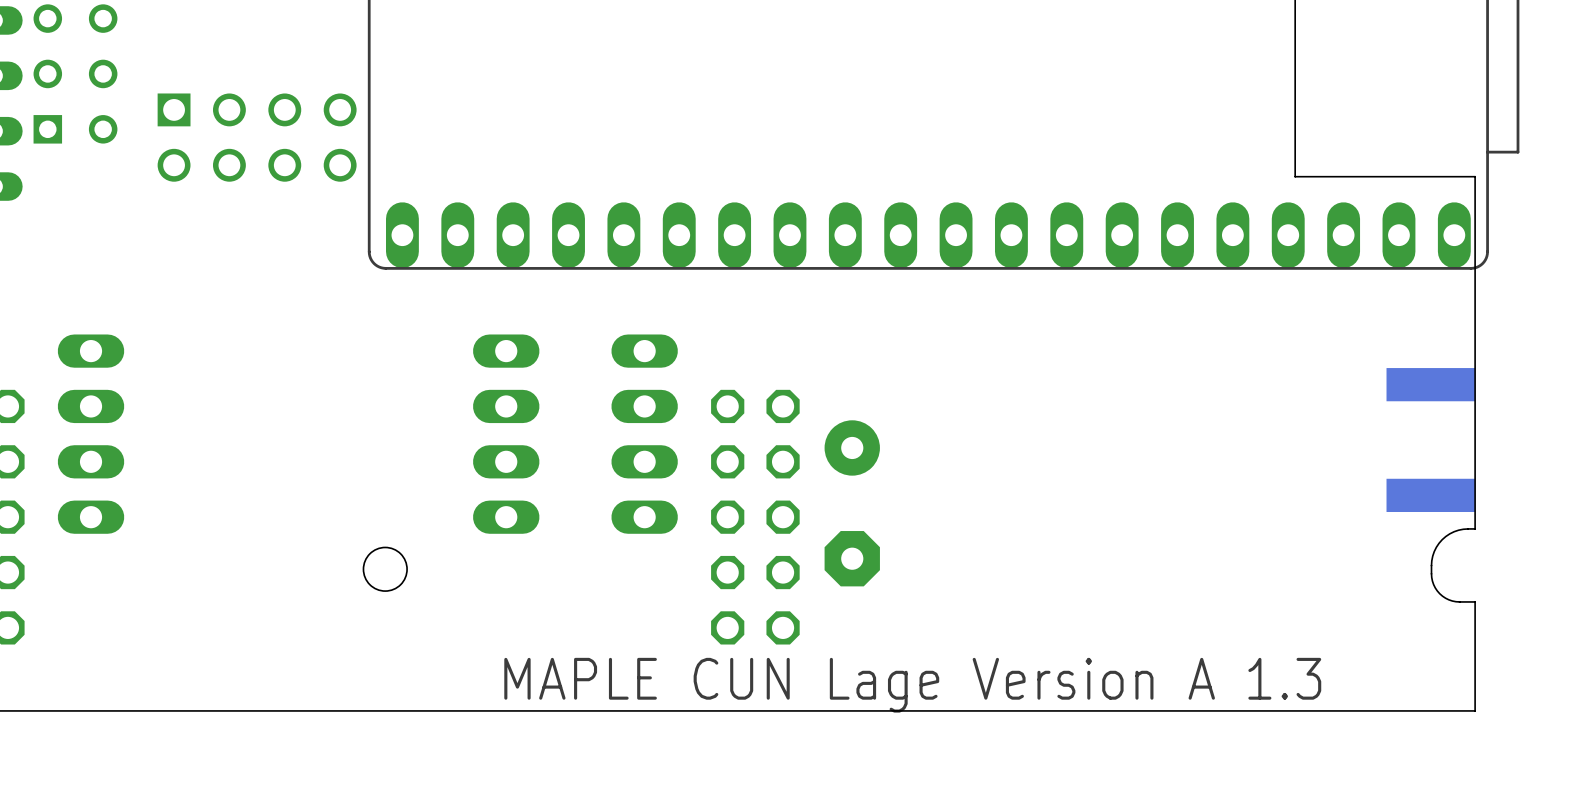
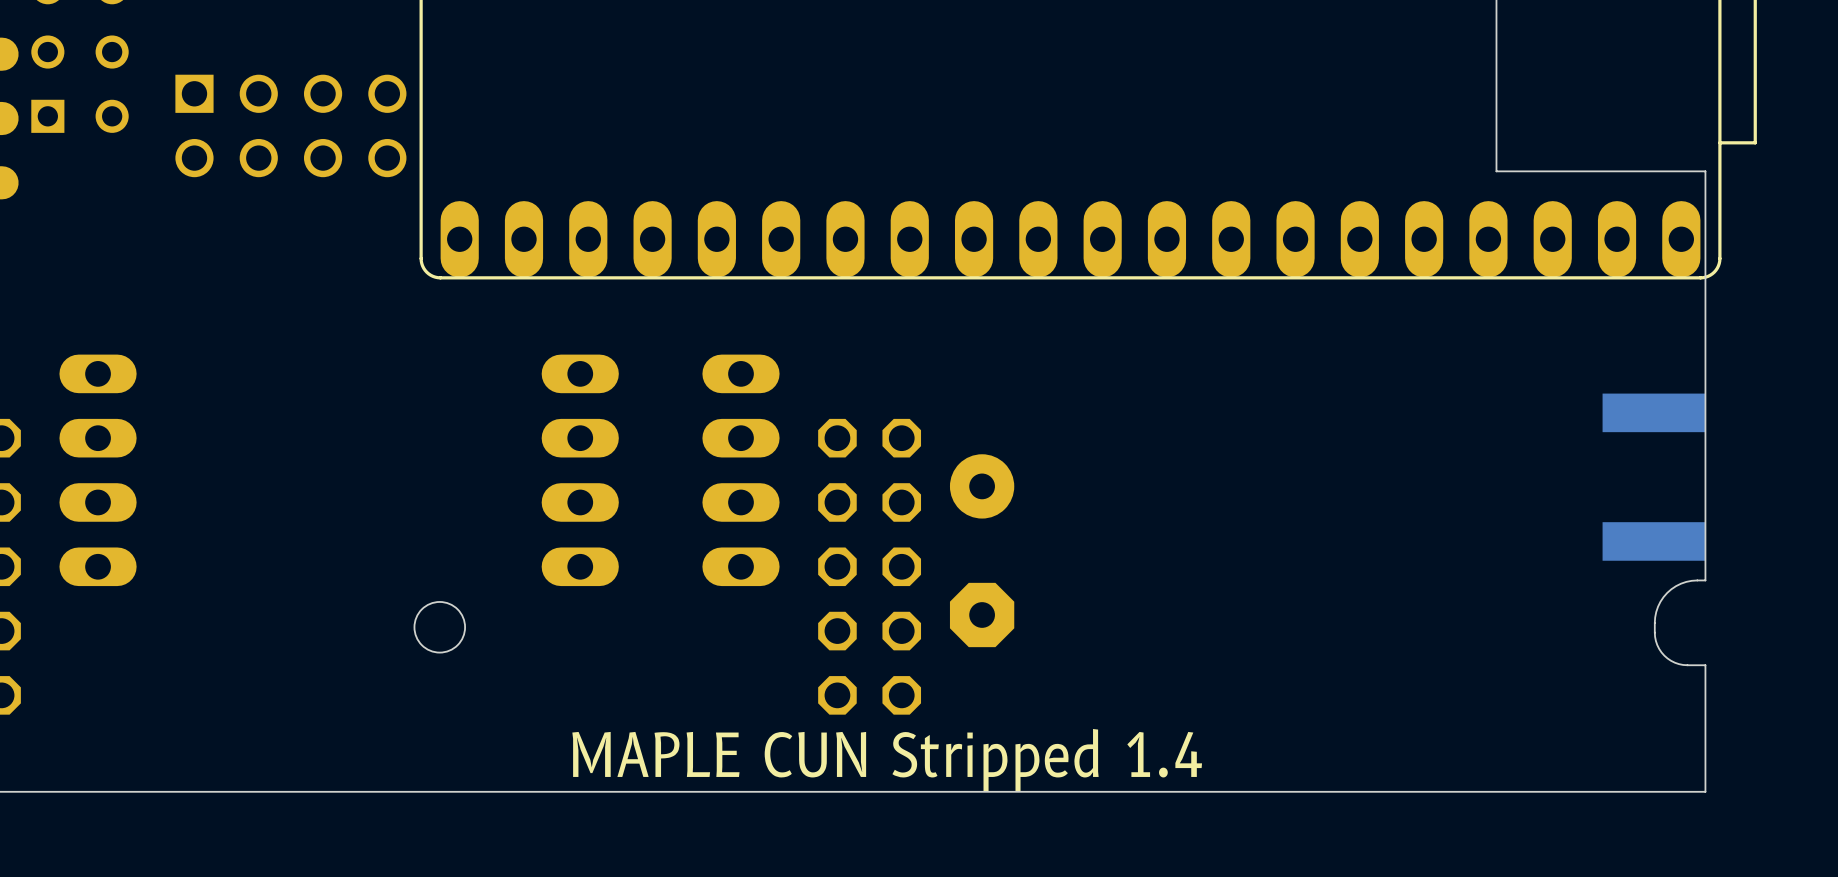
text: MAPLE CUN Lage Version A 1.3 (912, 685) -> MAPLE CUN Stripped 1.4 (887, 760)

